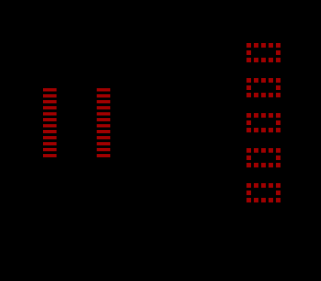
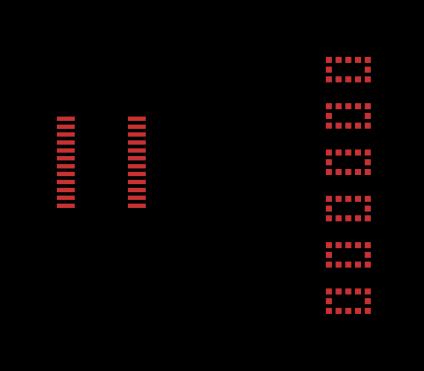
part: none -> (348, 301)

